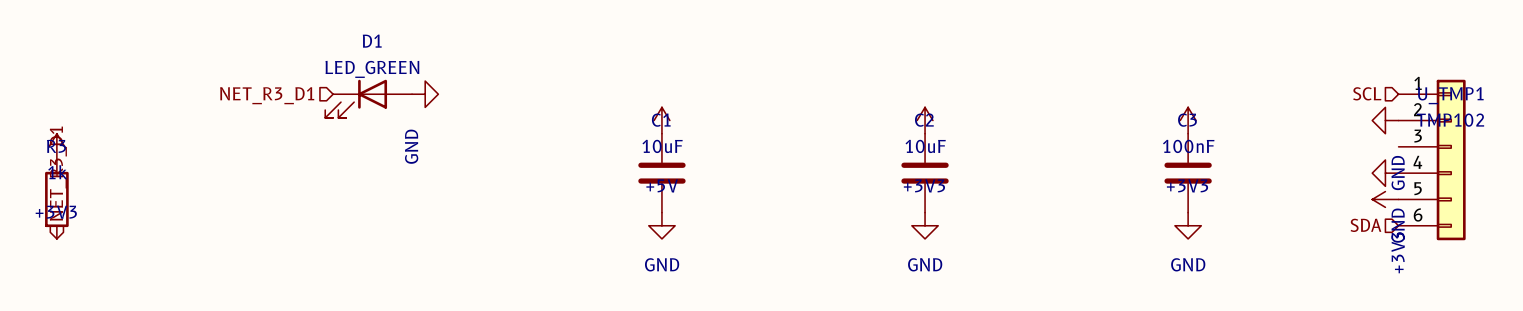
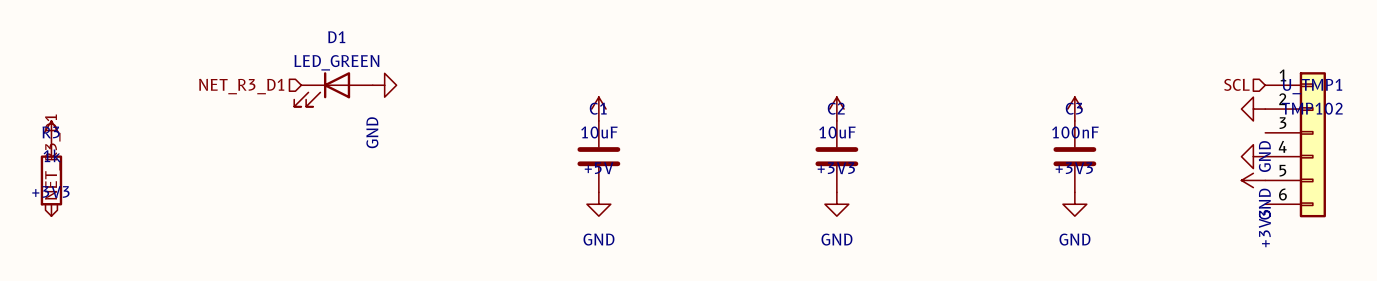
hierarchical label: SDA (1365, 225) -> none

